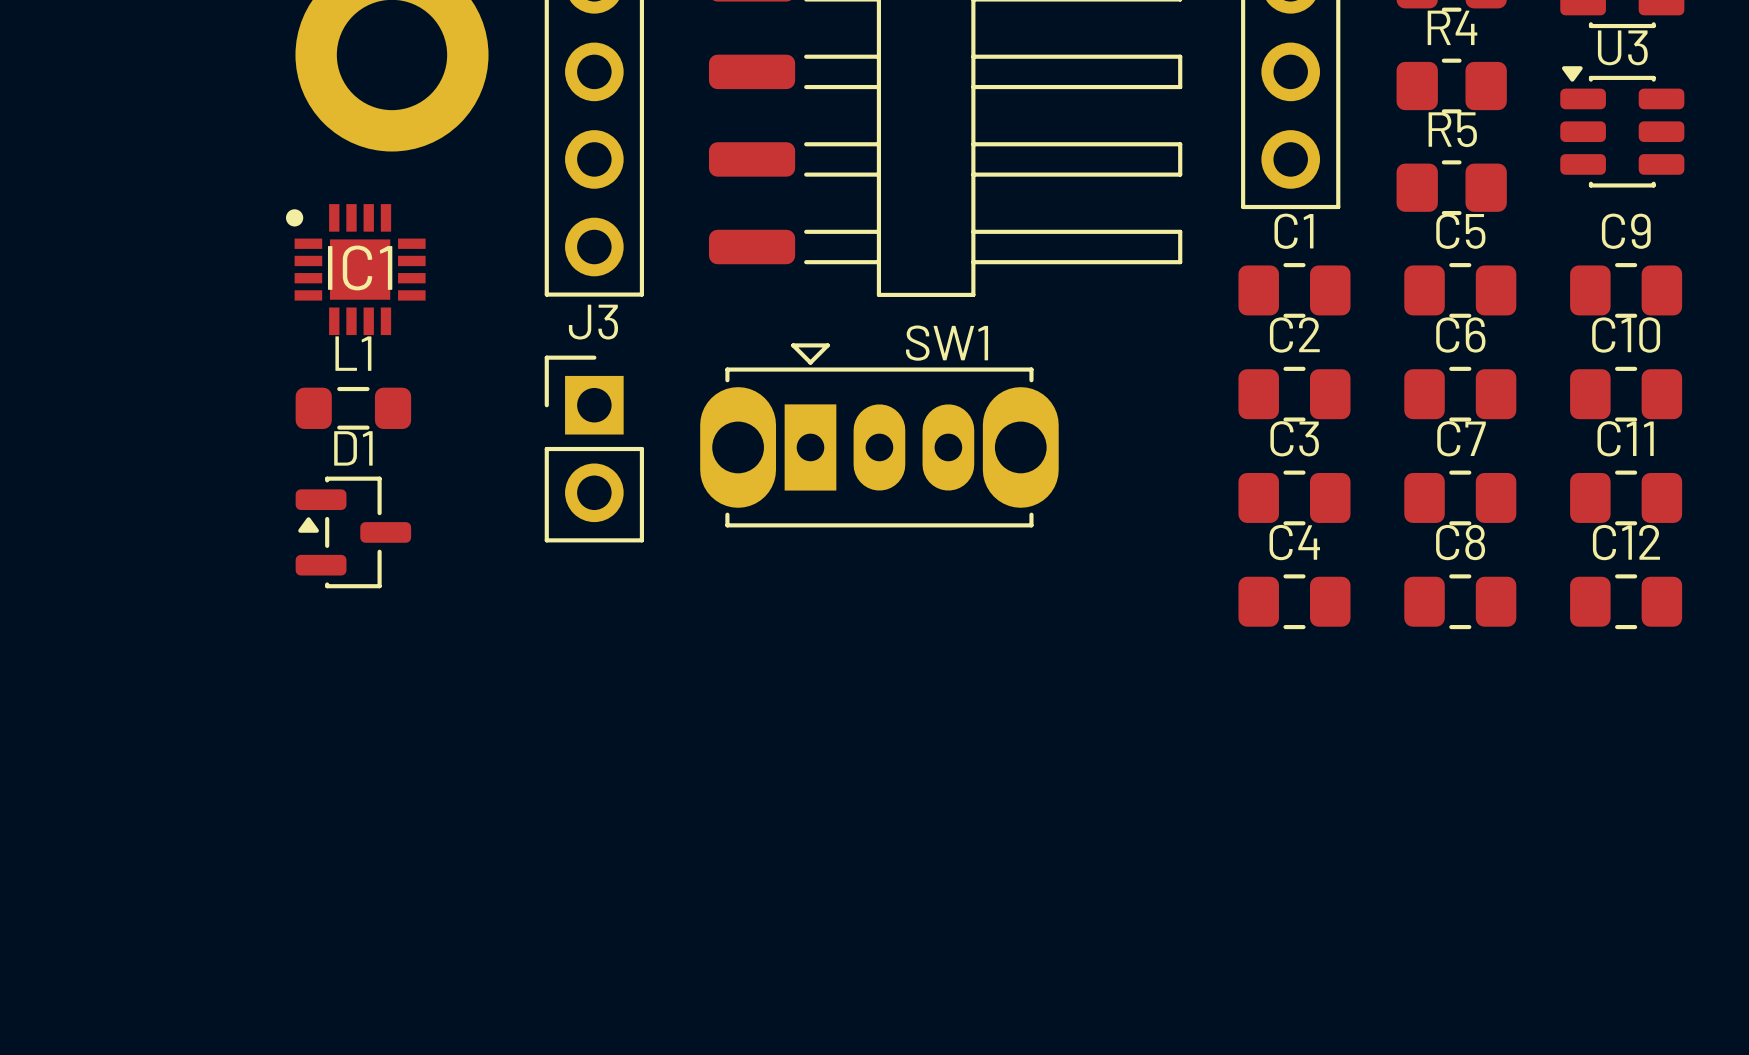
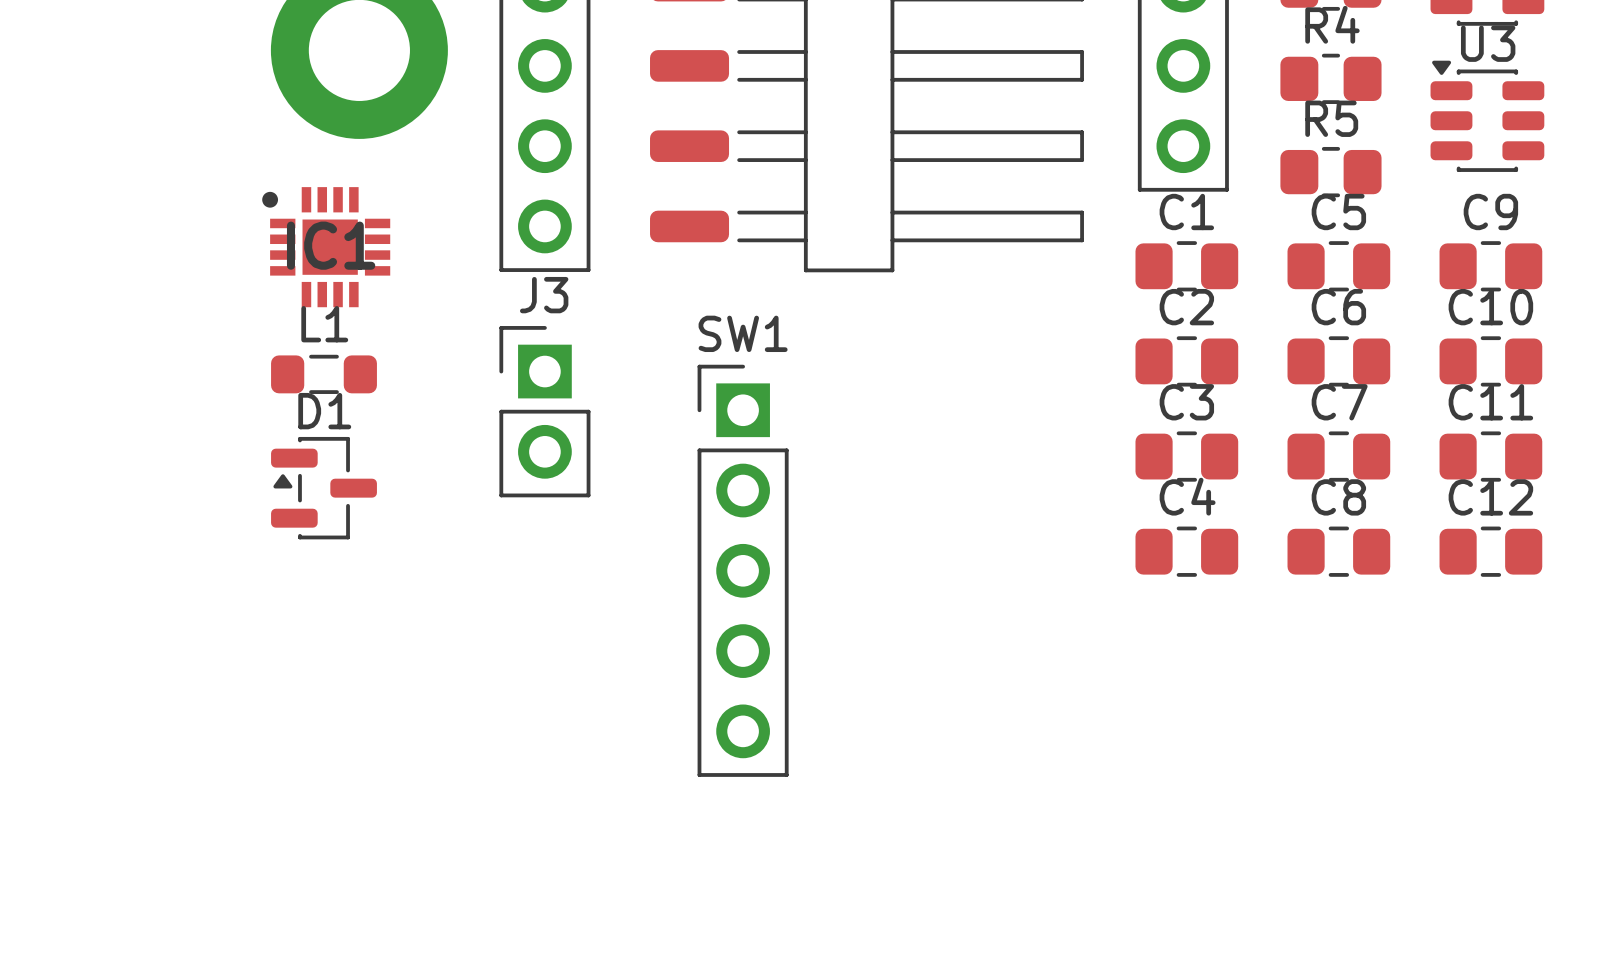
SW1 footprint: [700, 343, 1059, 528] -> [697, 364, 789, 777]
SW1 name position: SW1 (947, 343) -> SW1 (743, 333)

